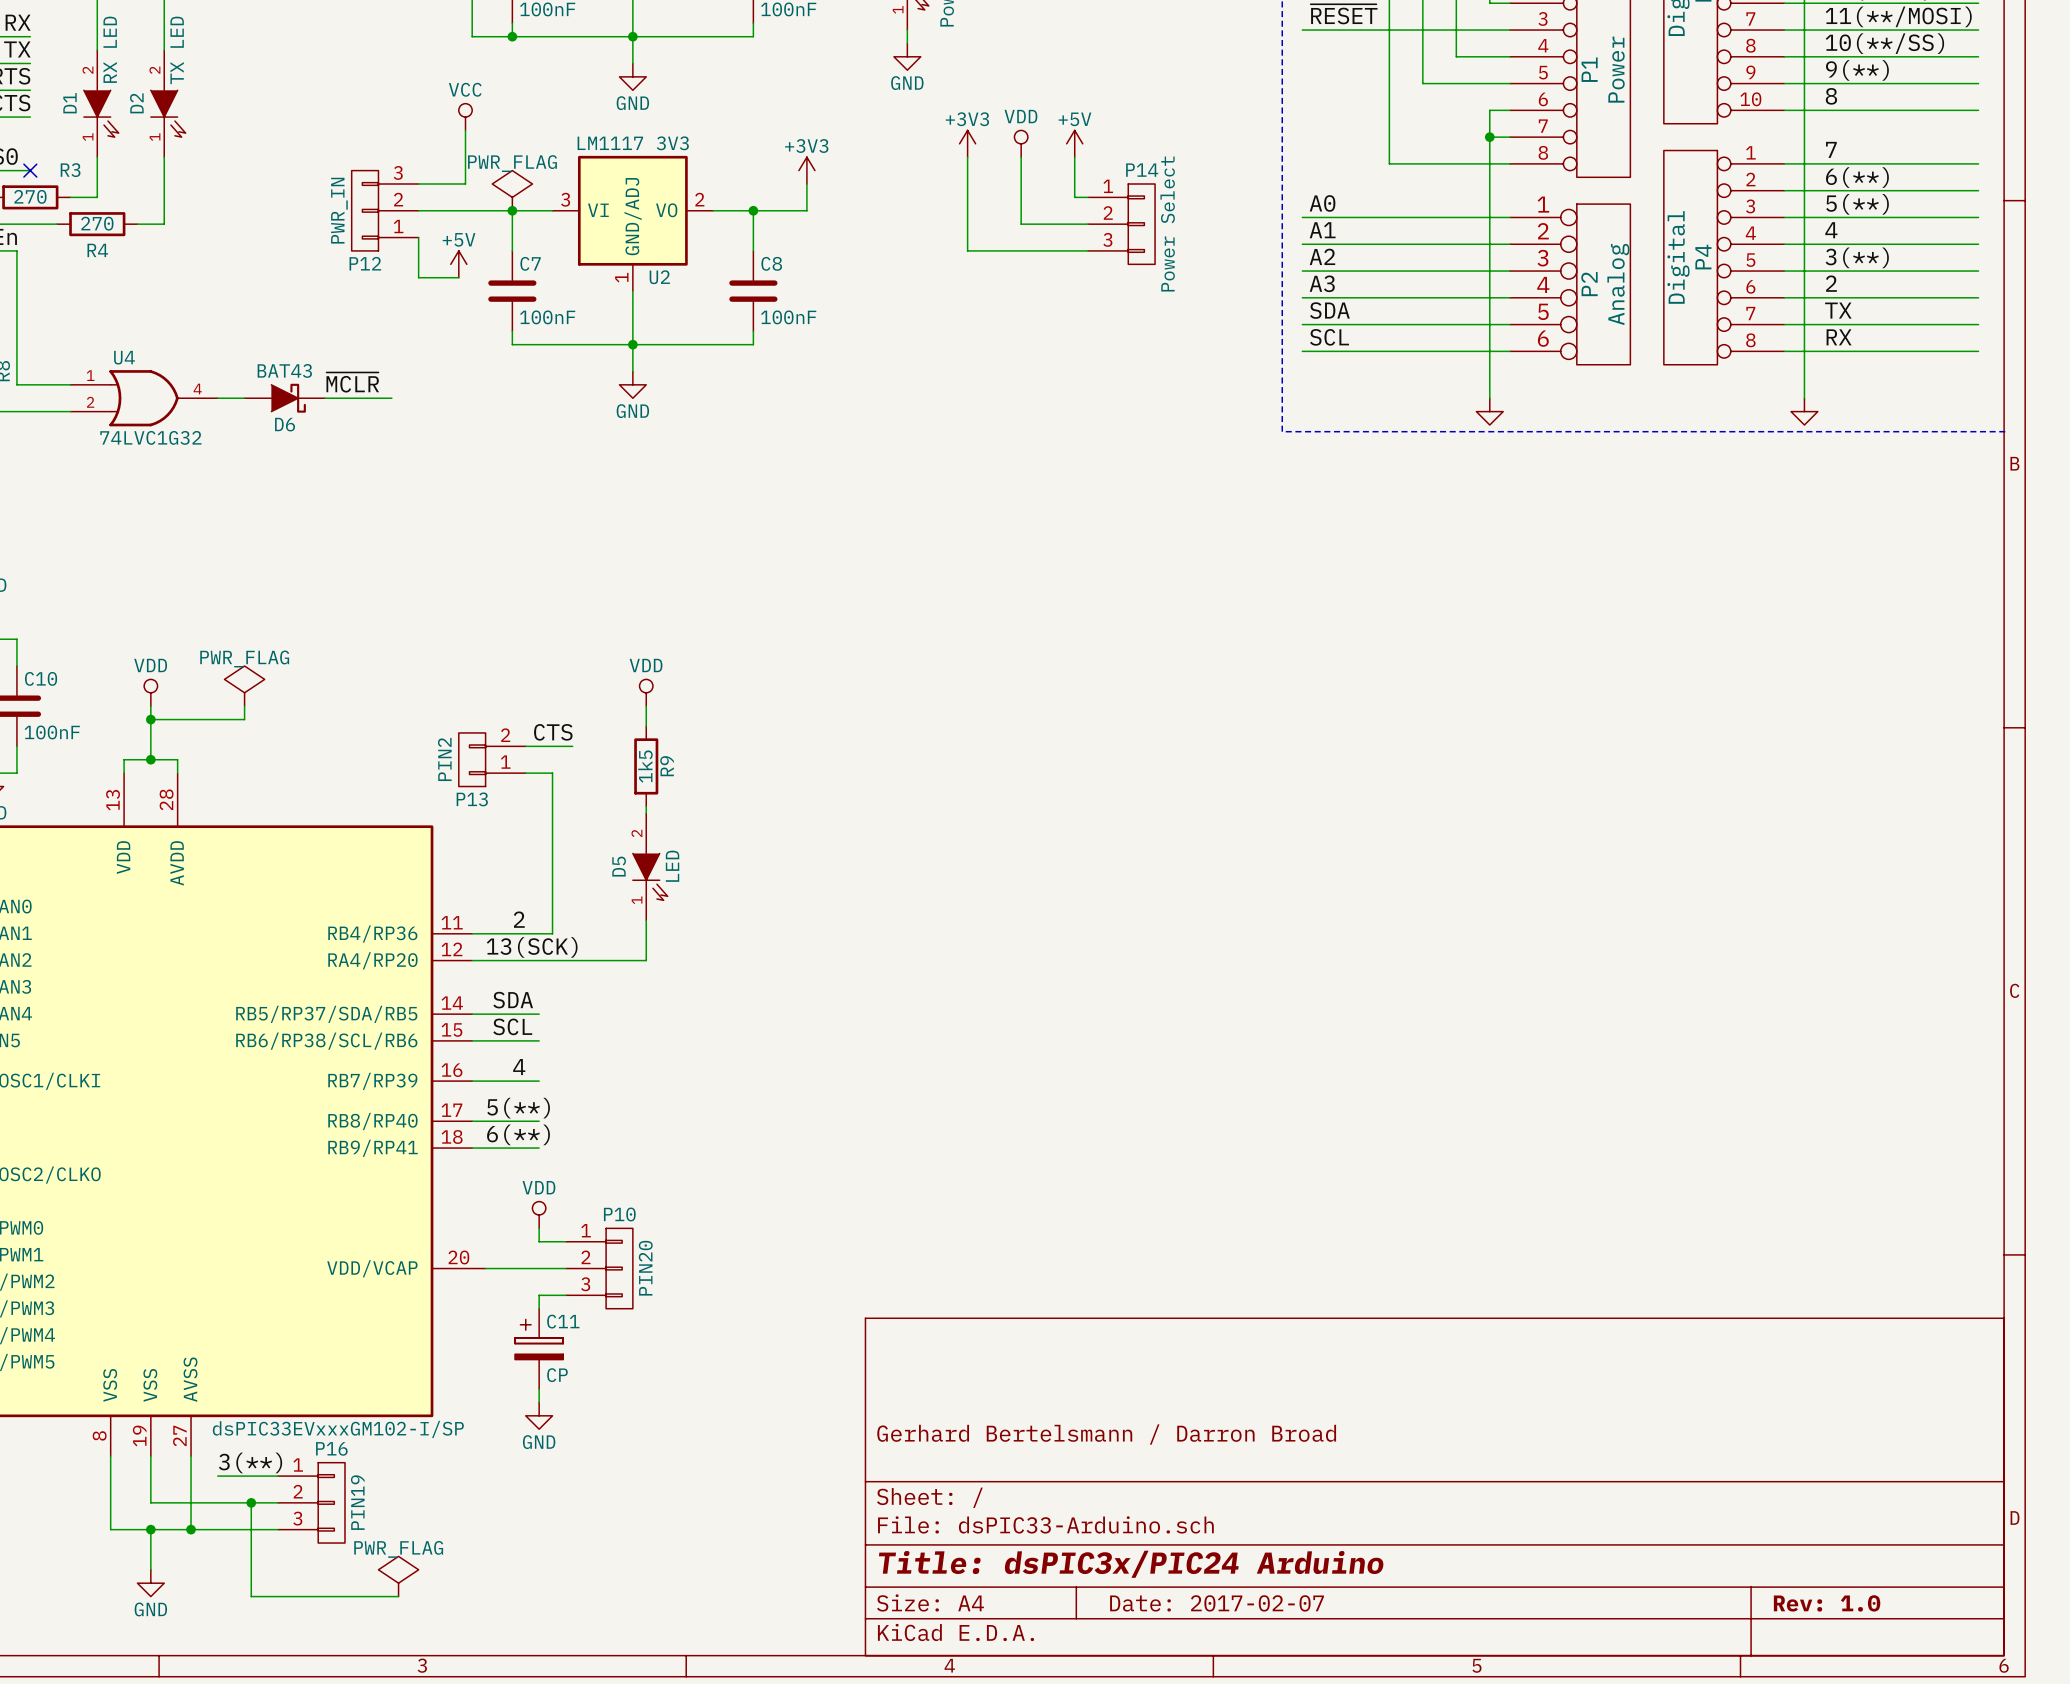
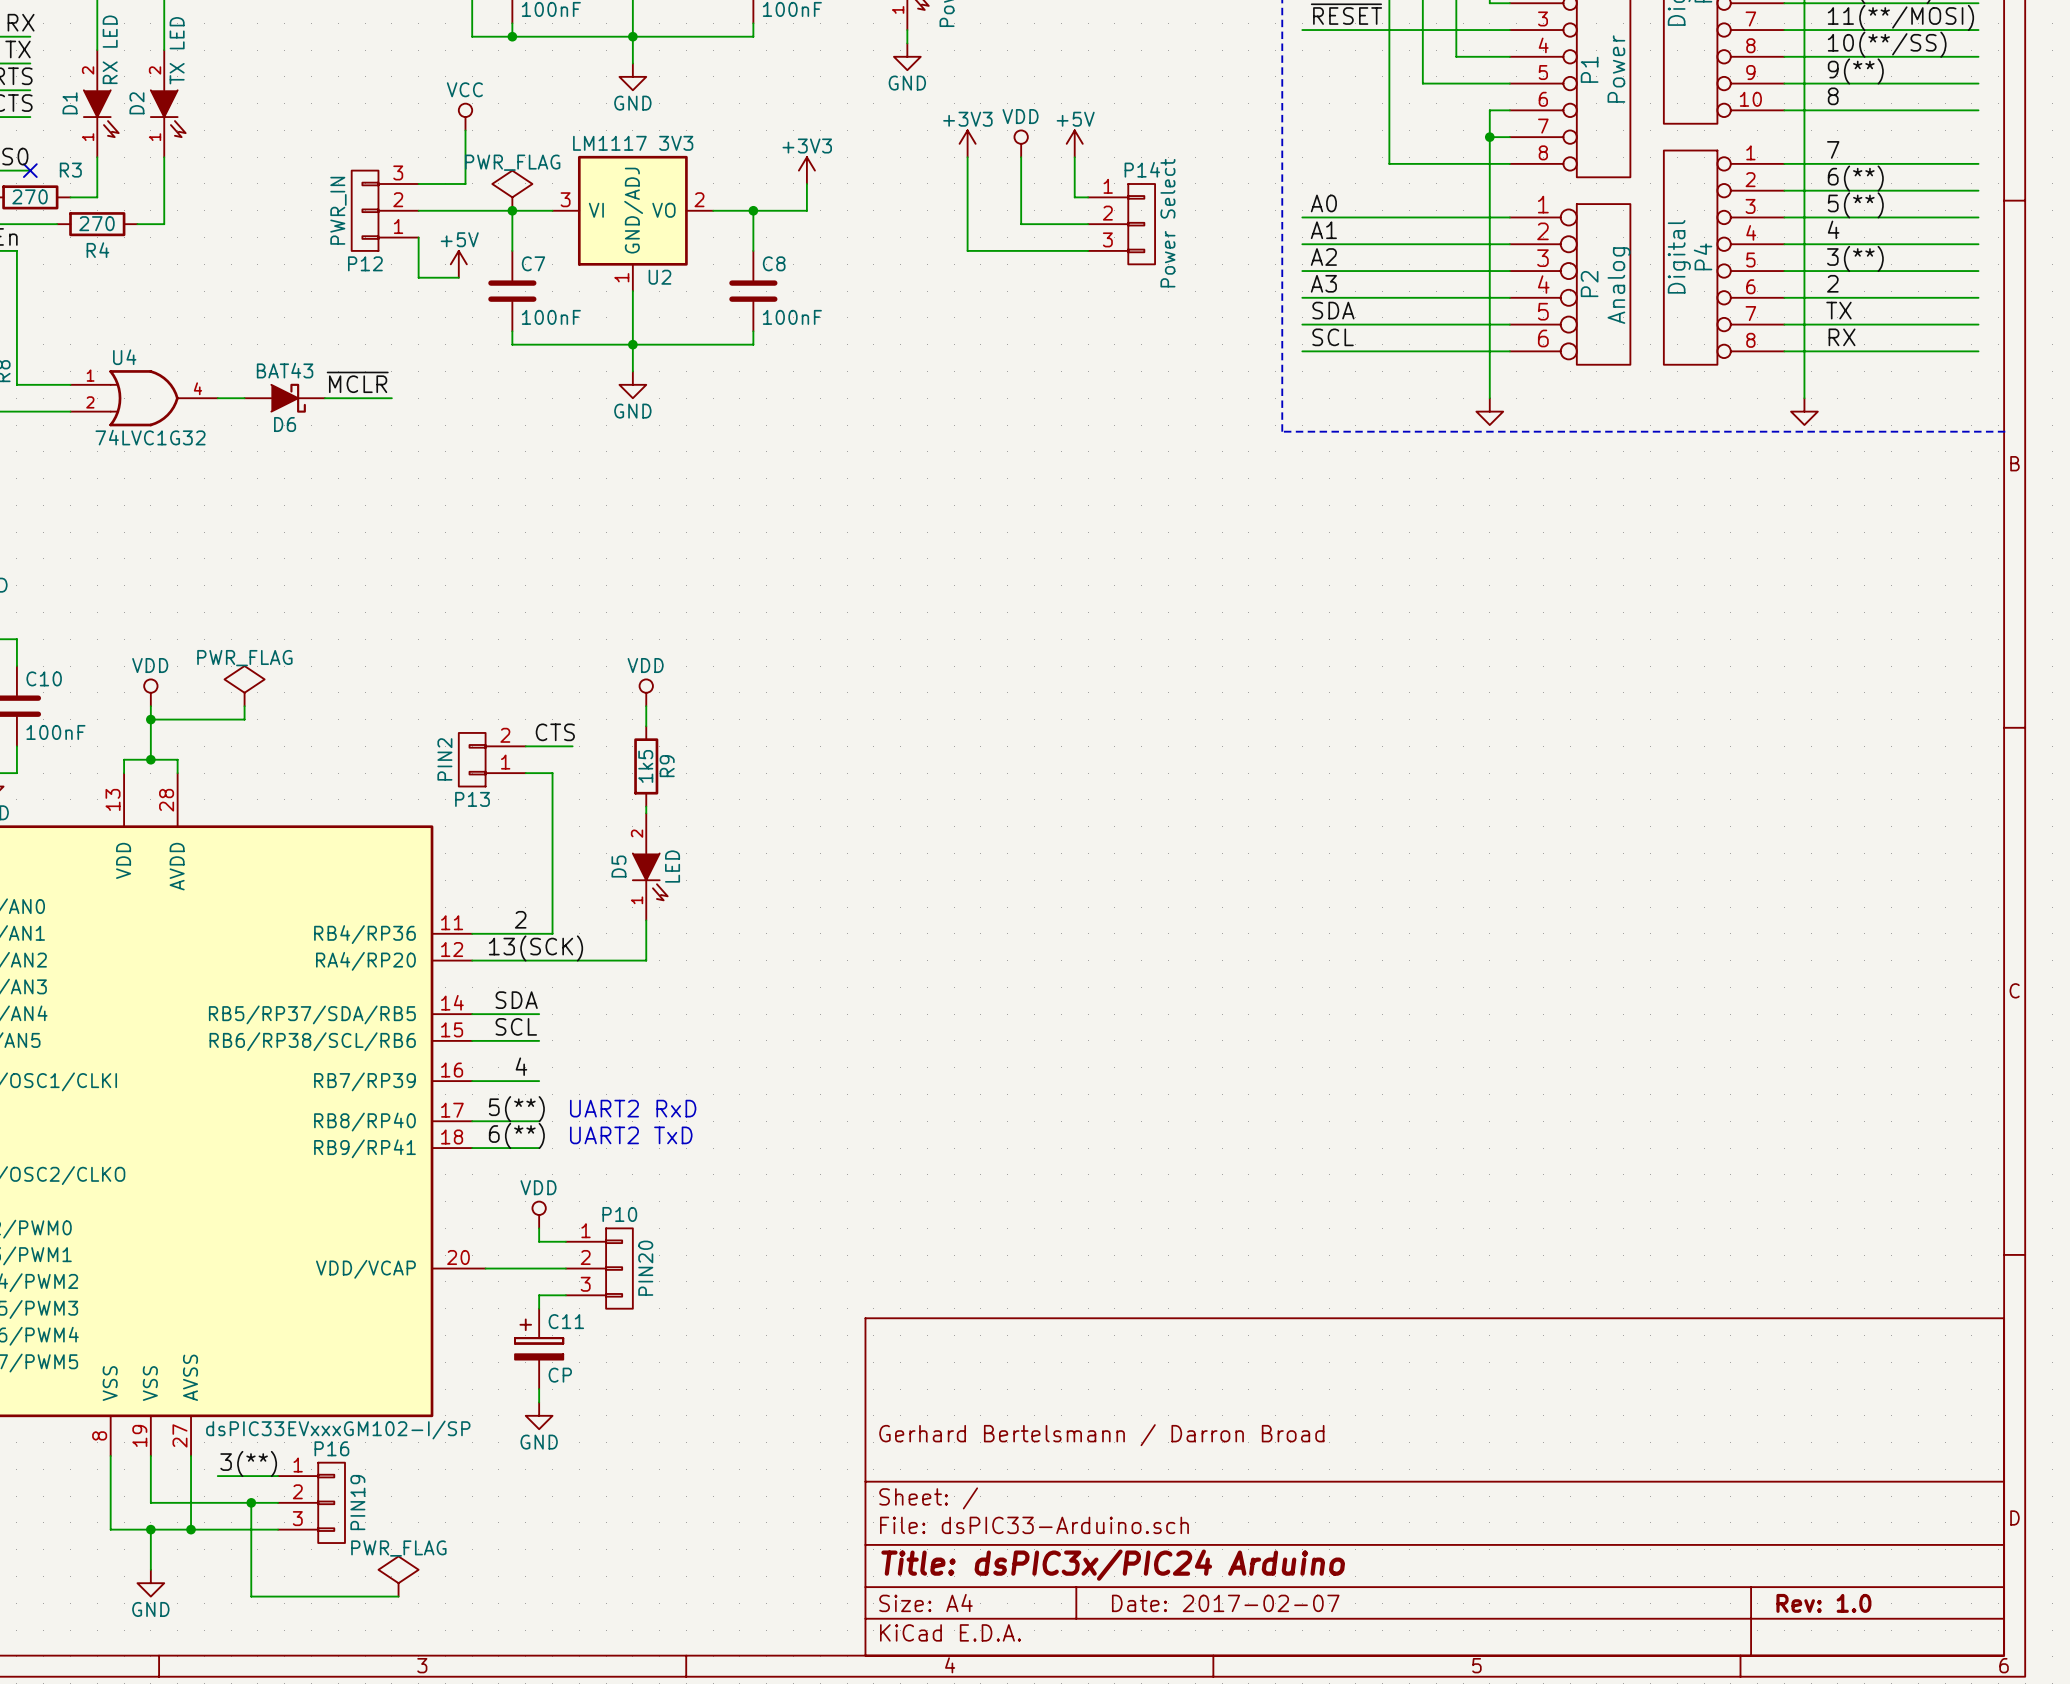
text: none -> UART2 RxD (633, 1108)
text: none -> UART2 TxD (631, 1135)

